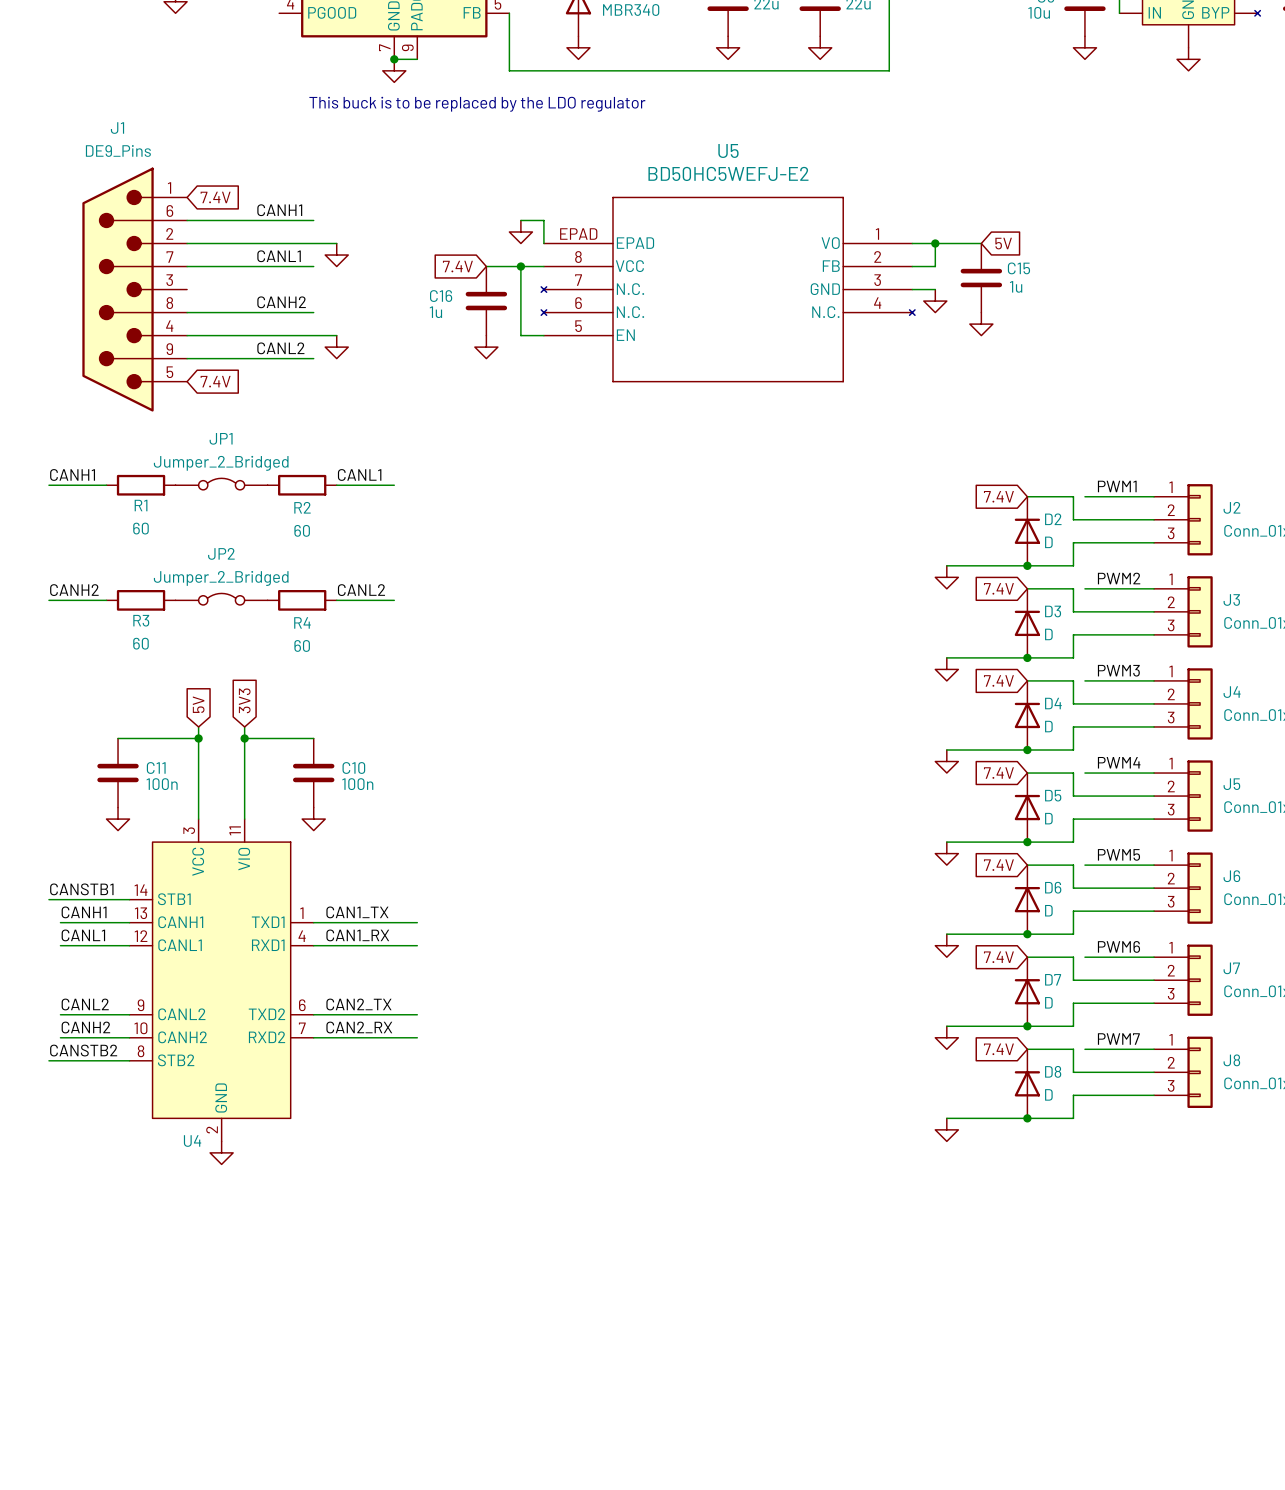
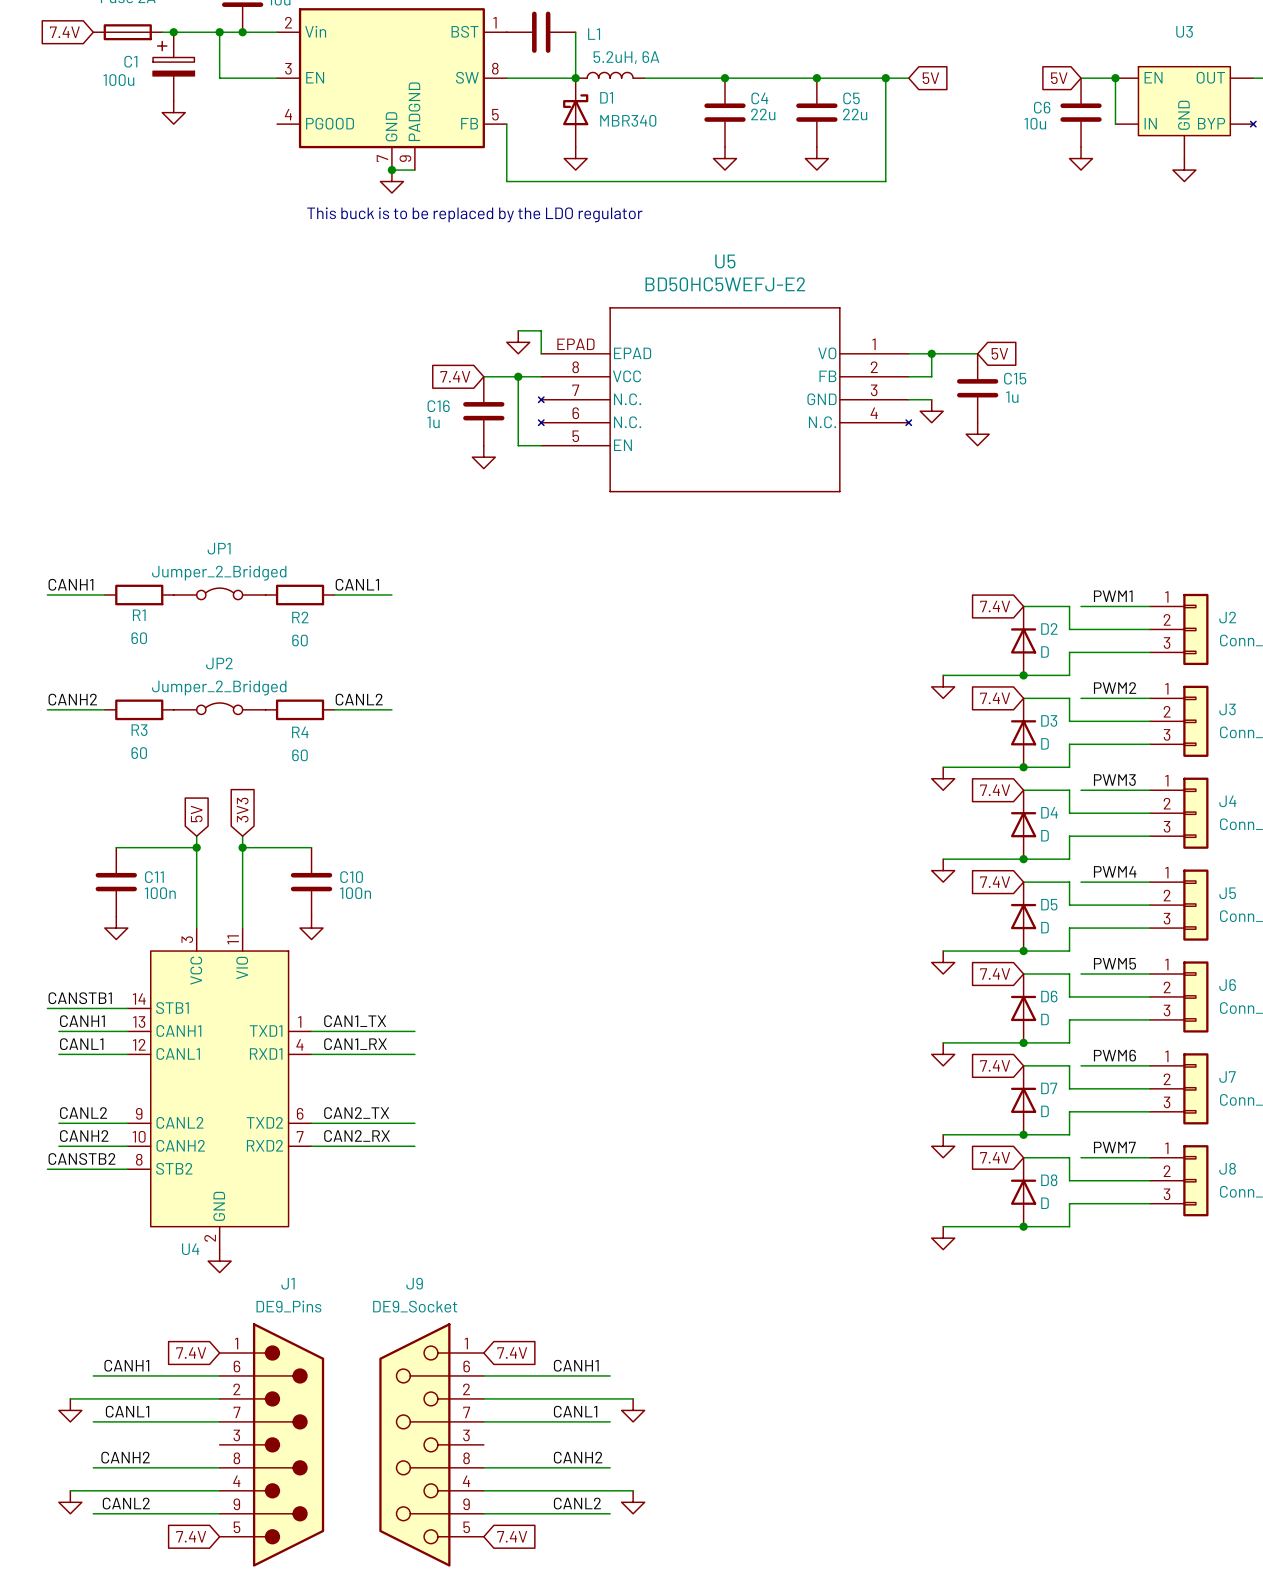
global label: 7.4V (215, 197) -> none
label: CANH1 (279, 210) -> none
wire: (187, 220) (313, 220) -> none
wire: (187, 243) (336, 243) -> none
power symbol: (336, 255) -> none
label: CANL1 (279, 256) -> none
wire: (187, 266) (313, 266) -> none
J1 flip: as is (118, 289) -> left-right (288, 1444)
J1 position: (134, 289) -> (271, 1444)
label: CANH2 (281, 302) -> none
wire: (187, 312) (313, 312) -> none
wire: (187, 335) (336, 335) -> none
power symbol: (336, 347) -> none
label: CANL2 (280, 348) -> none
wire: (187, 358) (313, 358) -> none
global label: 7.4V (215, 381) -> none
global label: none -> 7.4V (191, 1353)
global label: none -> 7.4V (512, 1353)
label: none -> CANH1 (126, 1365)
label: none -> CANH1 (576, 1365)
wire: none -> (93, 1375) (219, 1375)
wire: none -> (483, 1375) (610, 1375)
wire: none -> (70, 1398) (219, 1398)
wire: none -> (483, 1398) (633, 1398)
power symbol: none -> (70, 1410)
power symbol: none -> (633, 1410)
label: none -> CANL1 (127, 1411)
label: none -> CANL1 (575, 1411)
wire: none -> (93, 1421) (219, 1421)
wire: none -> (483, 1421) (610, 1421)
J9: none -> DE9_Socket (431, 1444)
label: none -> CANH2 (125, 1457)
label: none -> CANH2 (578, 1457)
wire: none -> (93, 1467) (219, 1467)
wire: none -> (483, 1467) (610, 1467)
wire: none -> (70, 1490) (219, 1490)
wire: none -> (483, 1490) (633, 1490)
power symbol: none -> (70, 1502)
power symbol: none -> (633, 1502)
label: none -> CANL2 (126, 1503)
label: none -> CANL2 (577, 1503)
wire: none -> (93, 1513) (219, 1513)
wire: none -> (483, 1513) (610, 1513)
global label: none -> 7.4V (191, 1536)
global label: none -> 7.4V (512, 1536)

